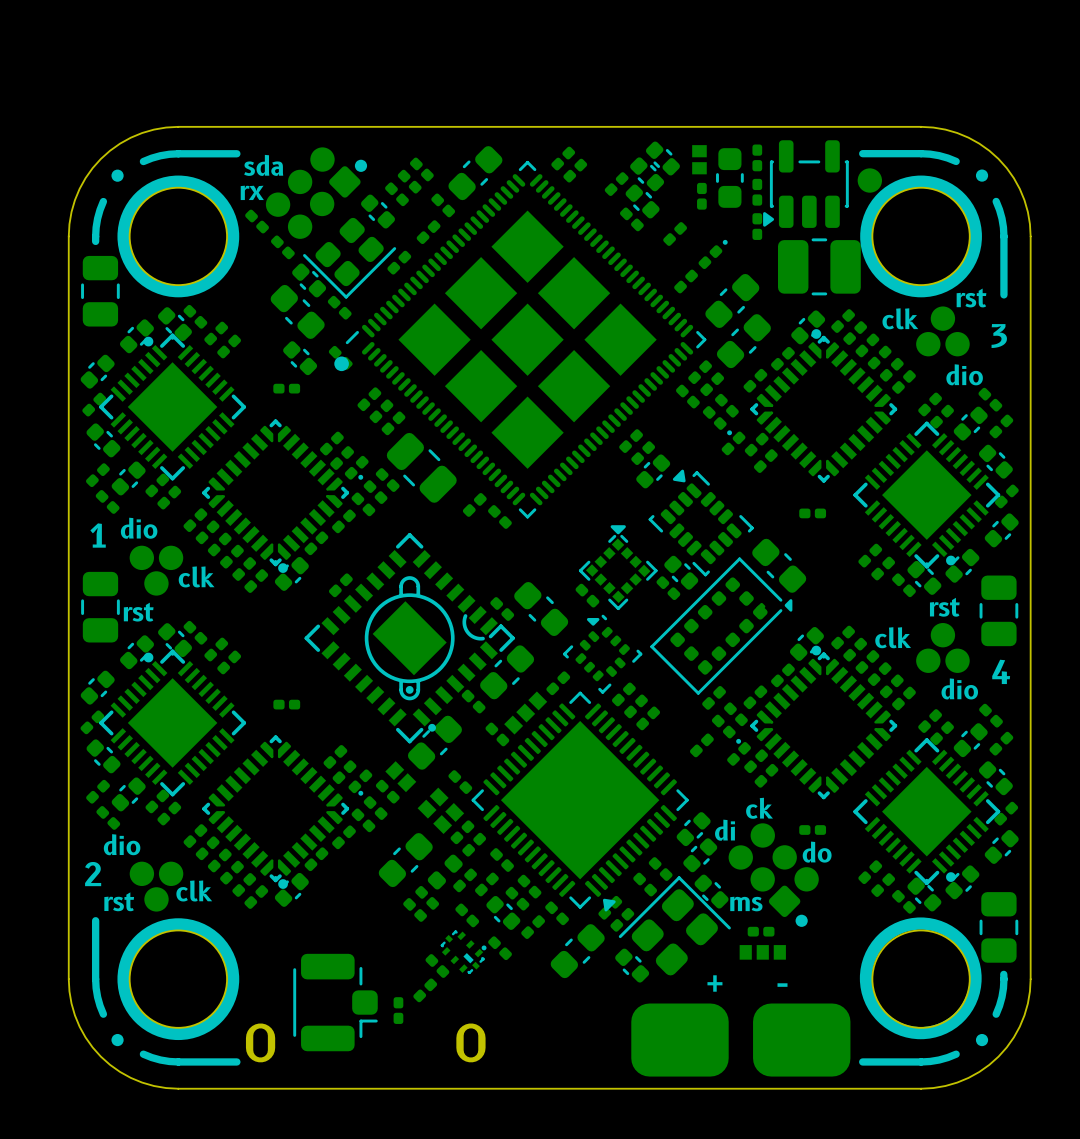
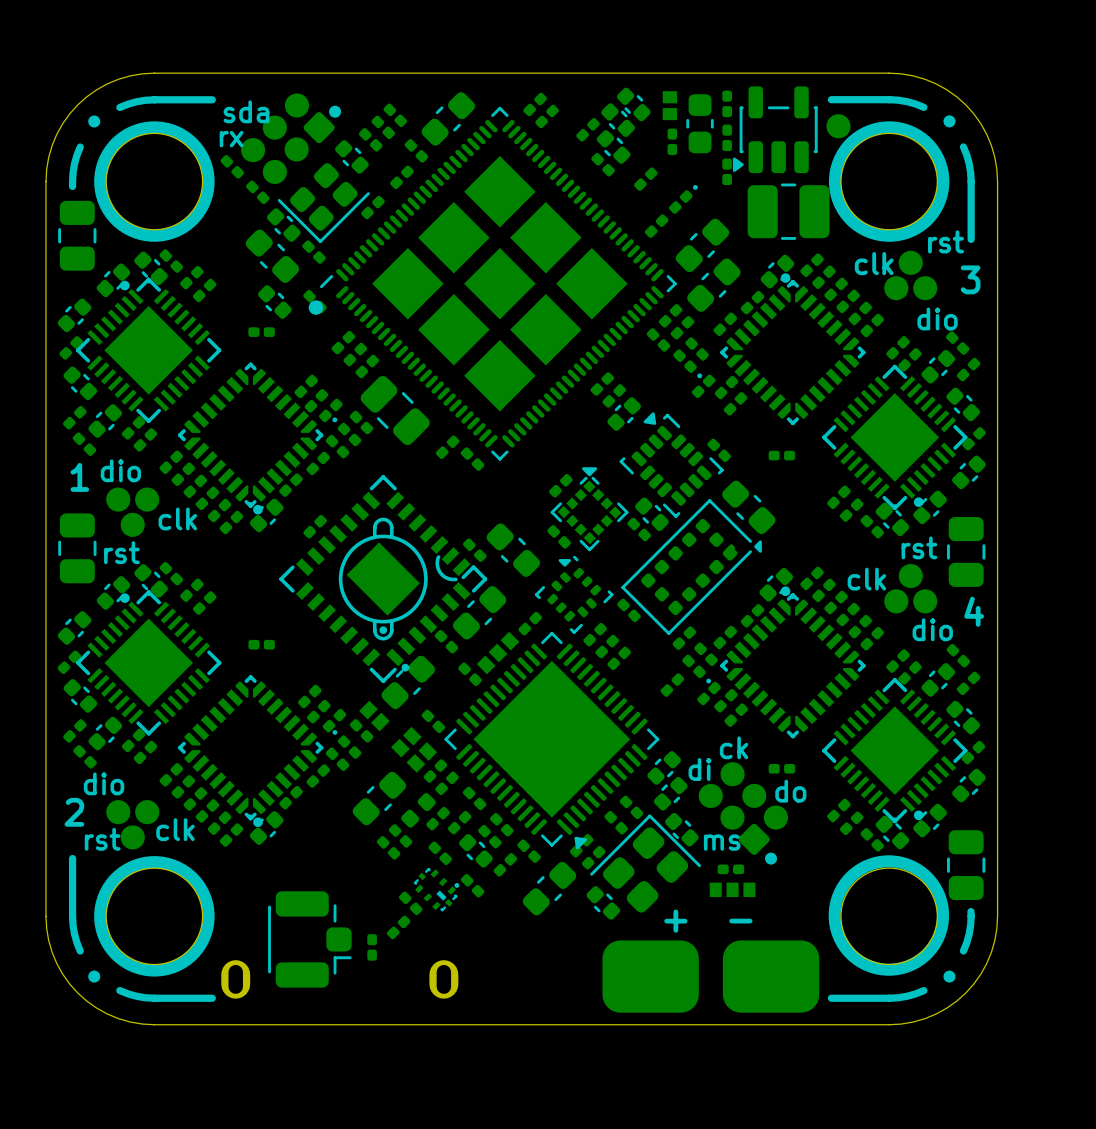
part: none -> (719, 450)
part: none -> (560, 485)
part: none -> (628, 610)

